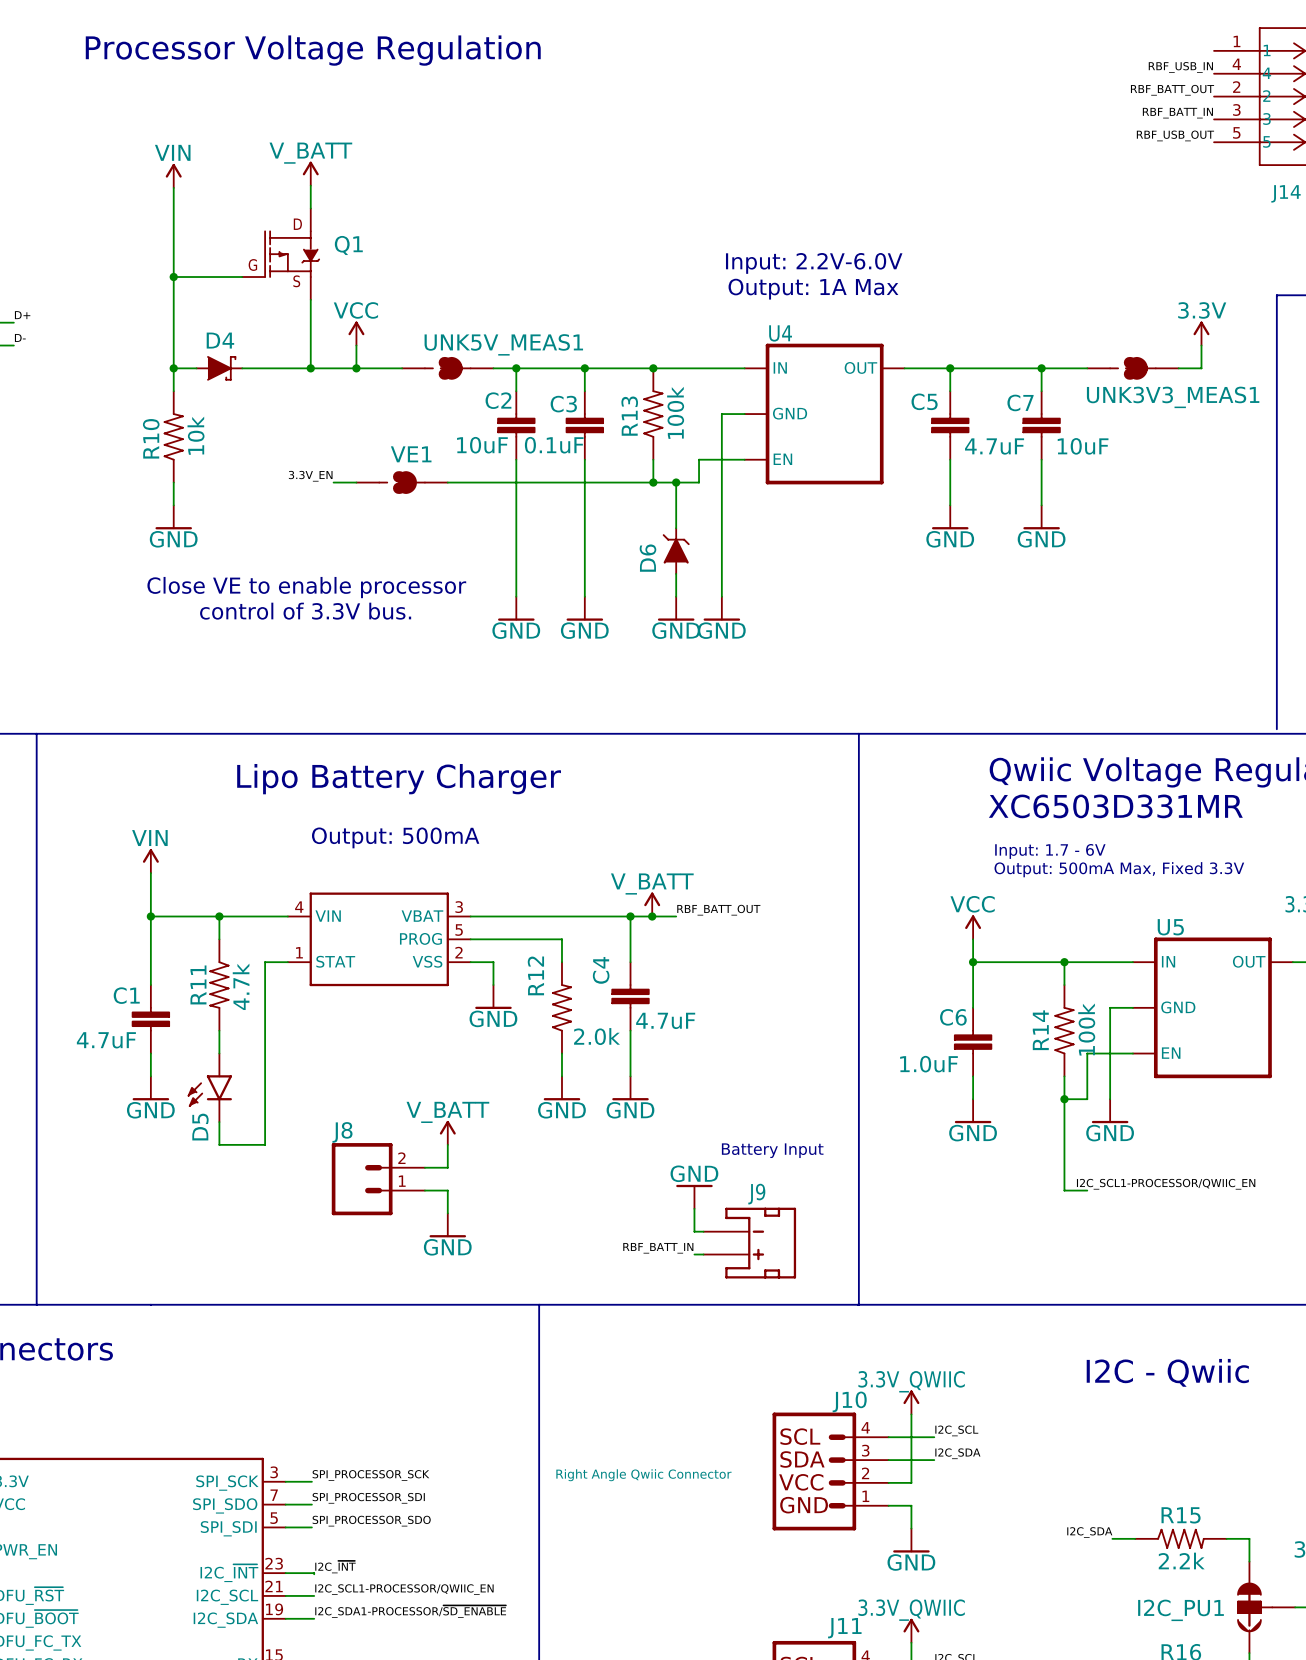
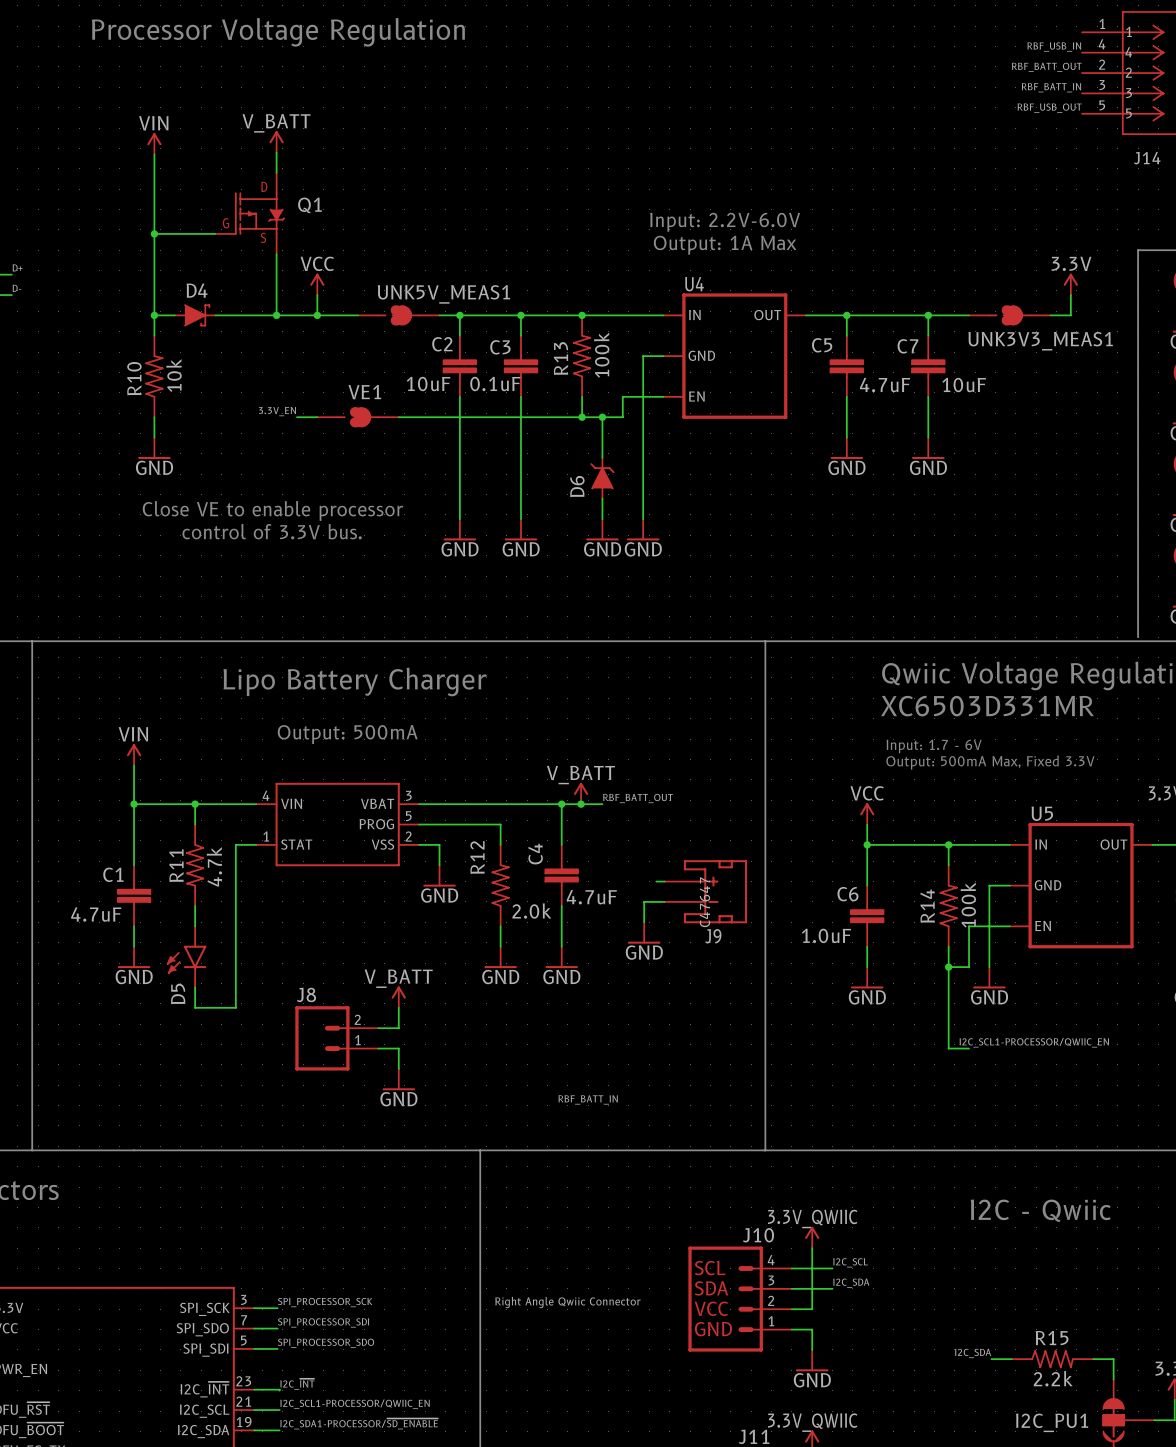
wire: none -> (656, 881) (664, 881)
wire: none -> (664, 901) (644, 901) (644, 922)
J9 text: none -> C47647 (704, 902)
text: Battery Input (772, 1150) -> none
power symbol rotation: 0° (694, 1186) -> 180° (644, 942)
power symbol position: GND (694, 1196) -> GND (644, 932)
wire: (694, 1208) (694, 1231) (703, 1231) -> none
J9 position: (749, 1243) -> (705, 891)
J9 flip: as is (760, 1243) -> up-down (715, 891)
wire: (694, 1254) (703, 1254) -> none

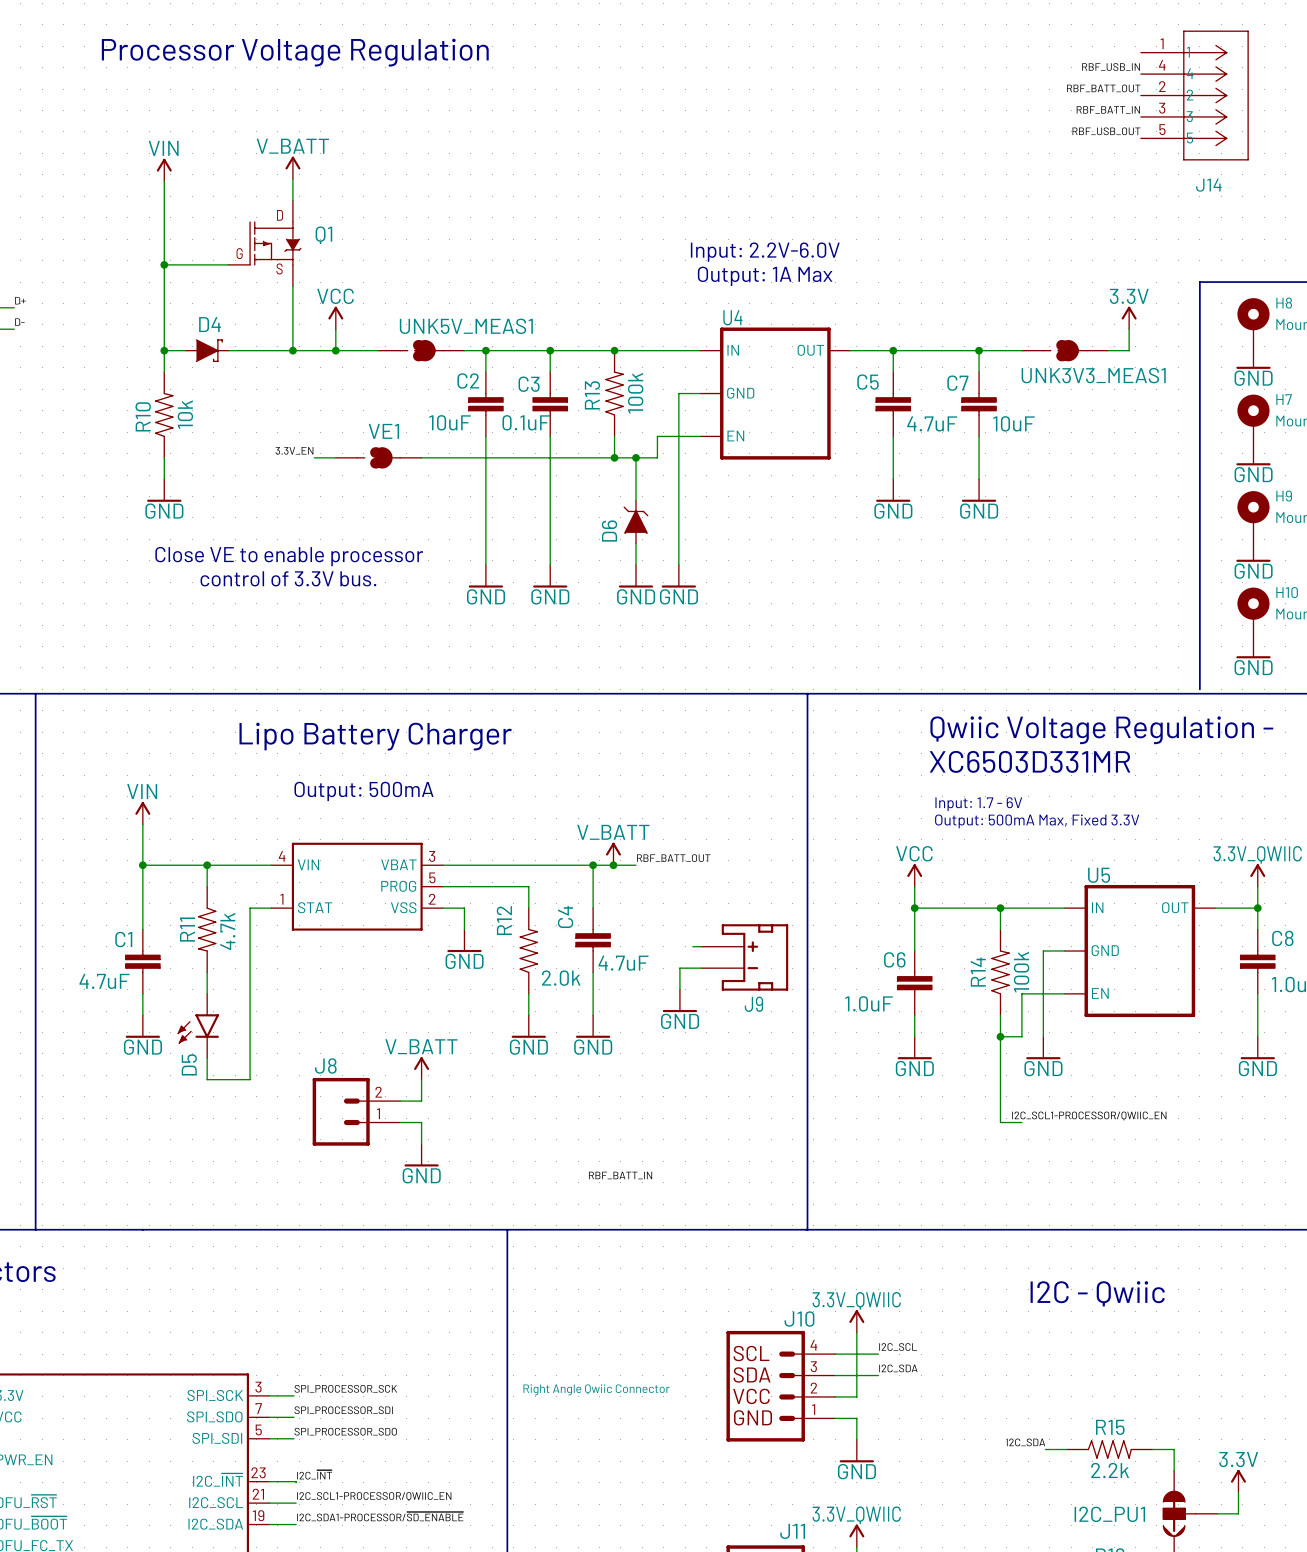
J9 text: C47647 (704, 902) -> none

